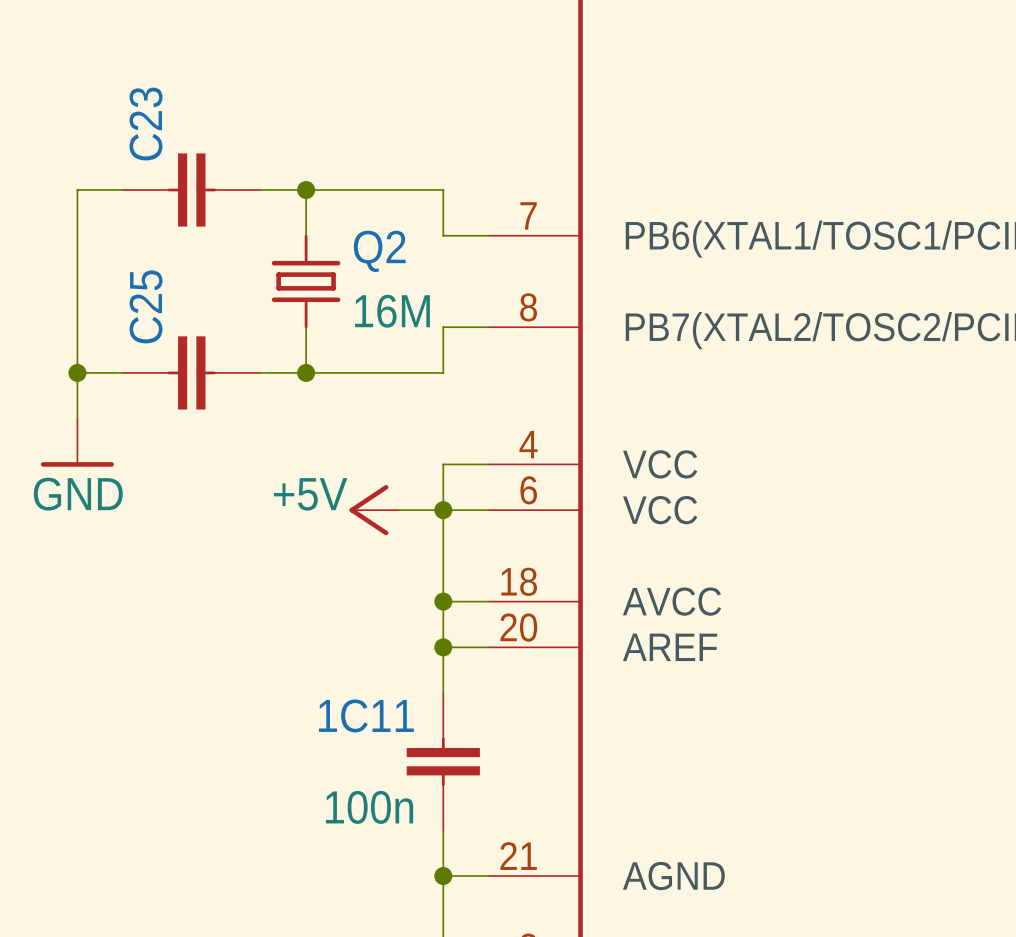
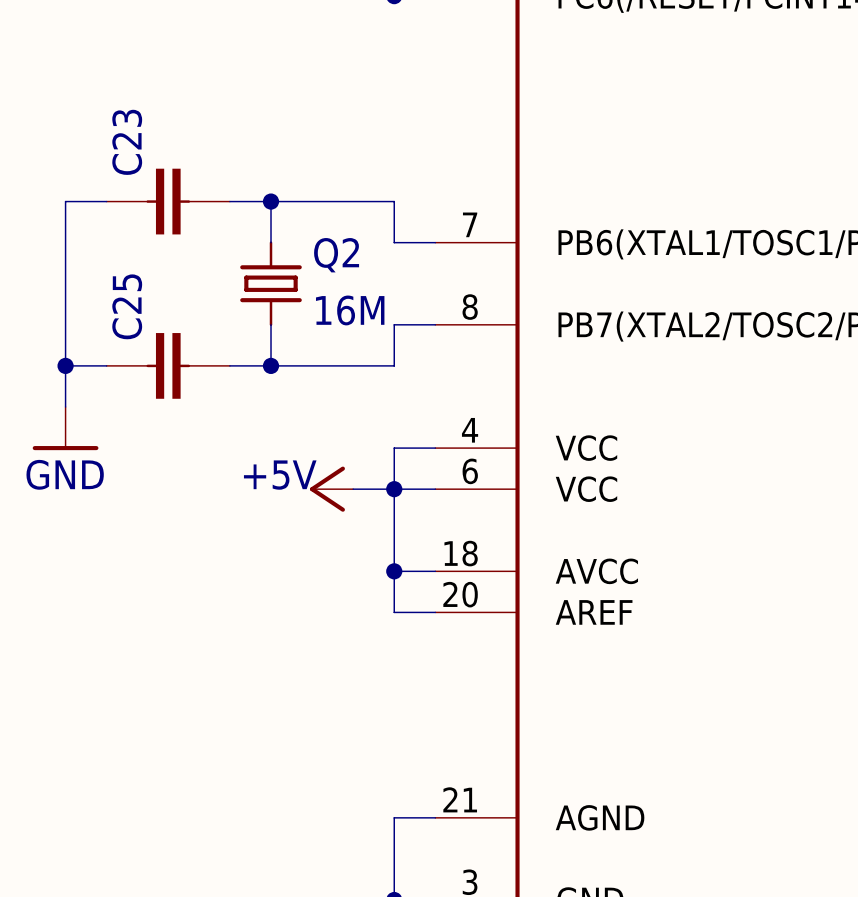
wire: (443, 647) (443, 693) -> none
junction: (443, 647) -> none
1C11: 100n (443, 761) -> none
wire: (443, 830) (443, 876) -> none
junction: (443, 876) -> none

